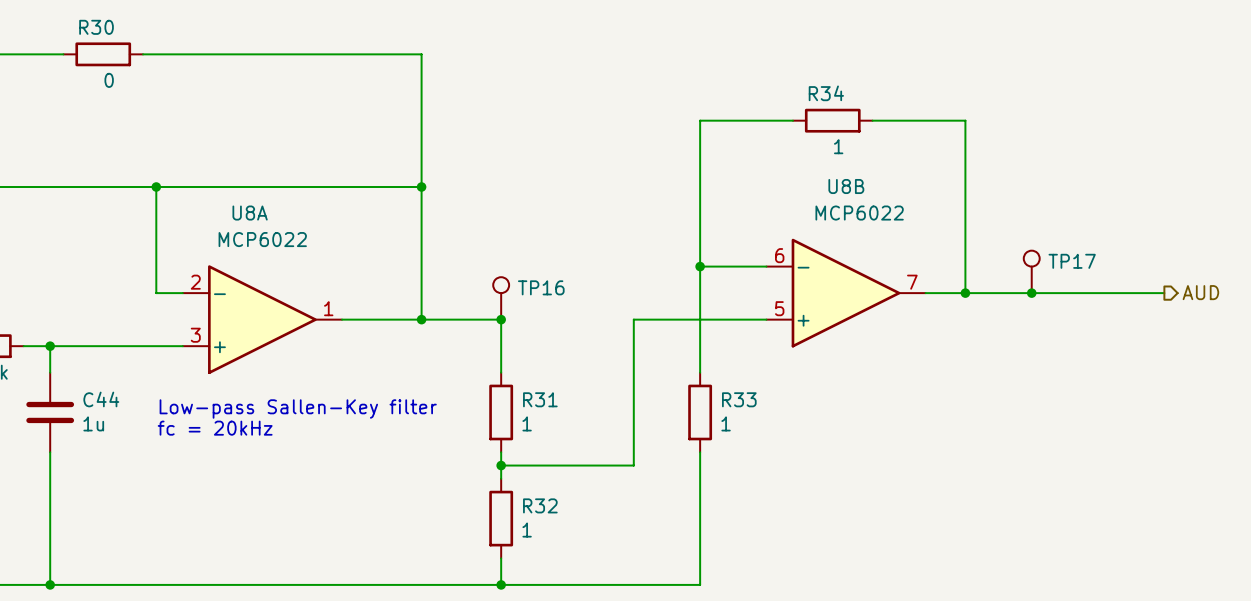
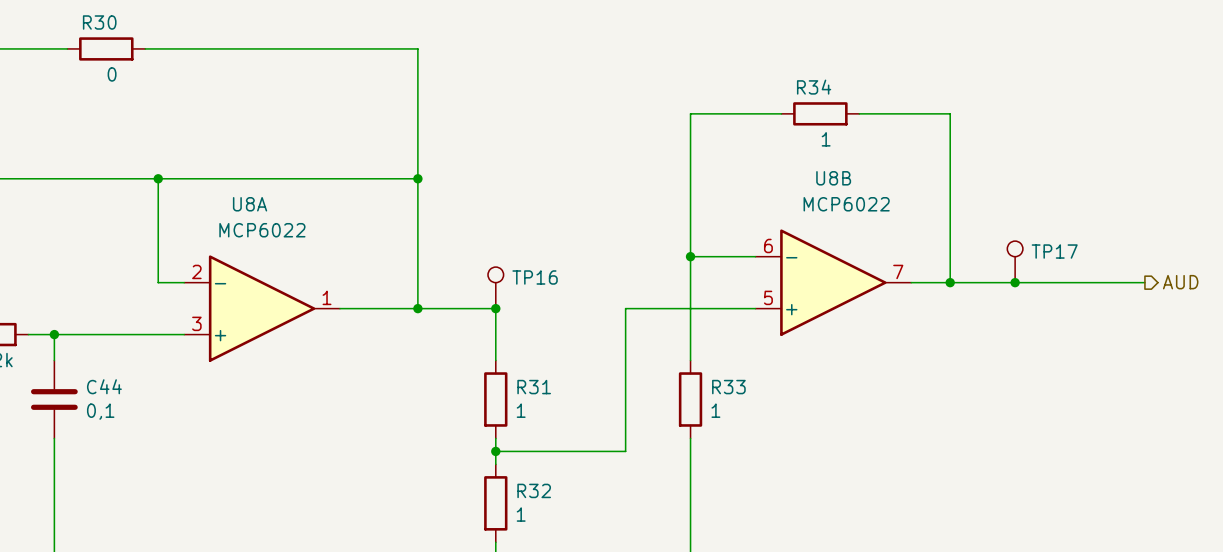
text: Low-pass Sallen-Key filter (298, 409) -> none
C44 value: 1u (93, 423) -> 0,1 (100, 411)
text: fc = 20kHz (215, 428) -> none

